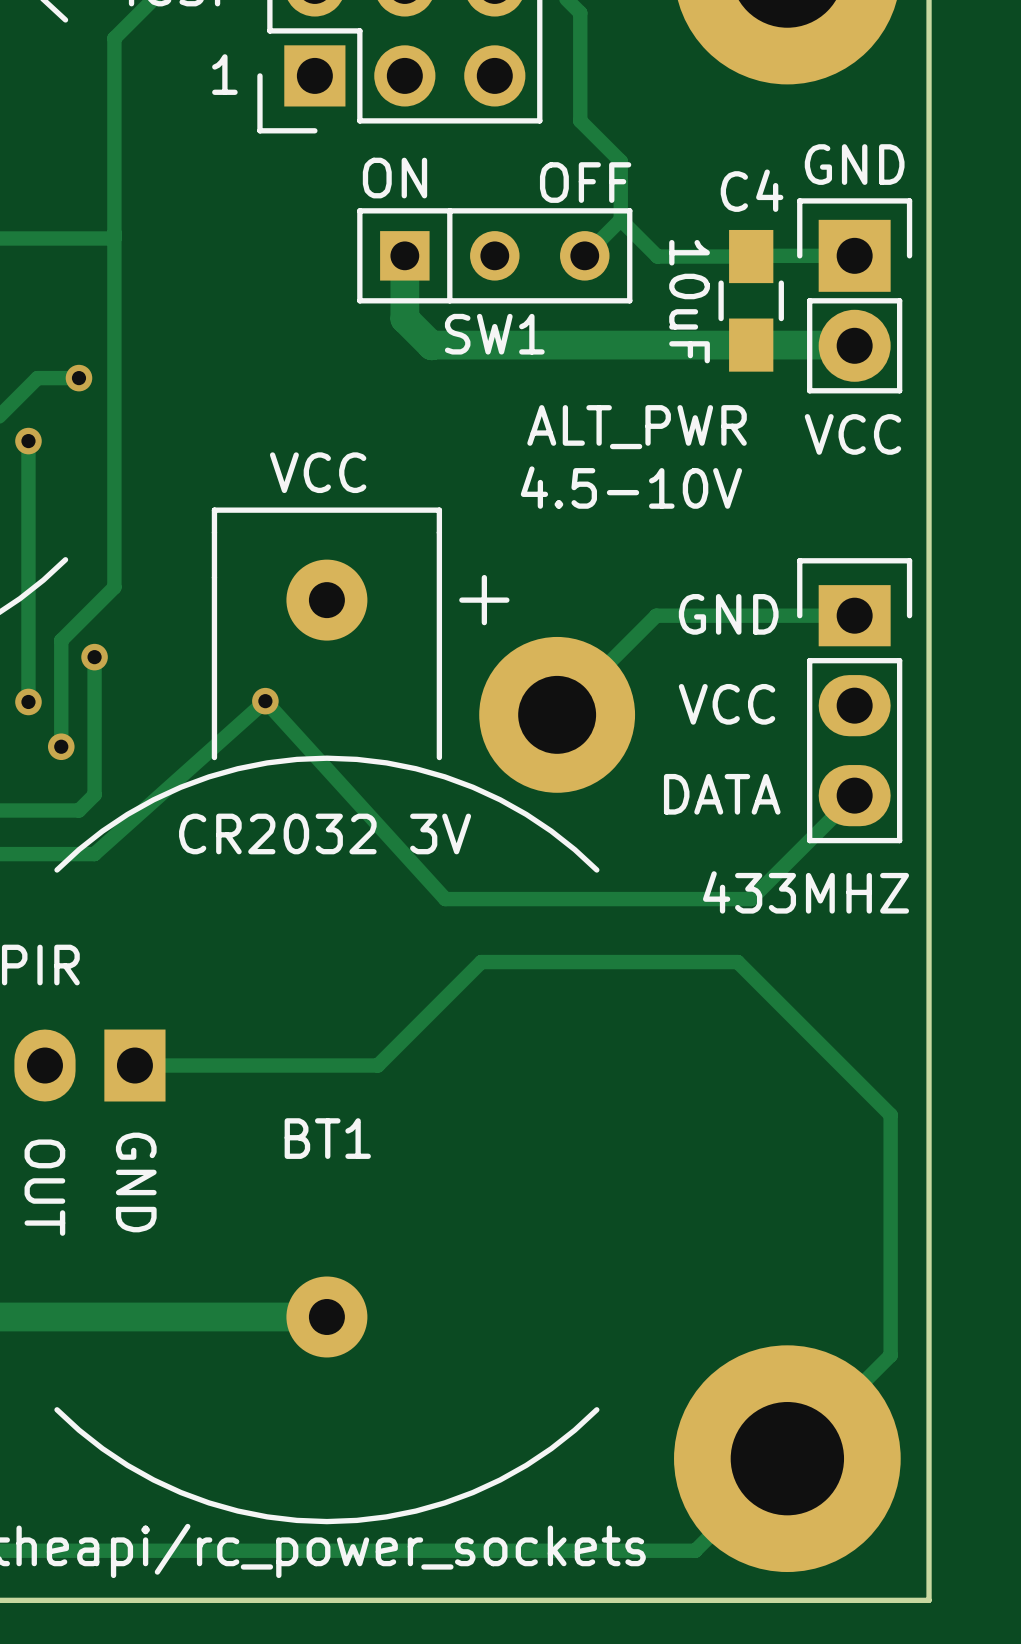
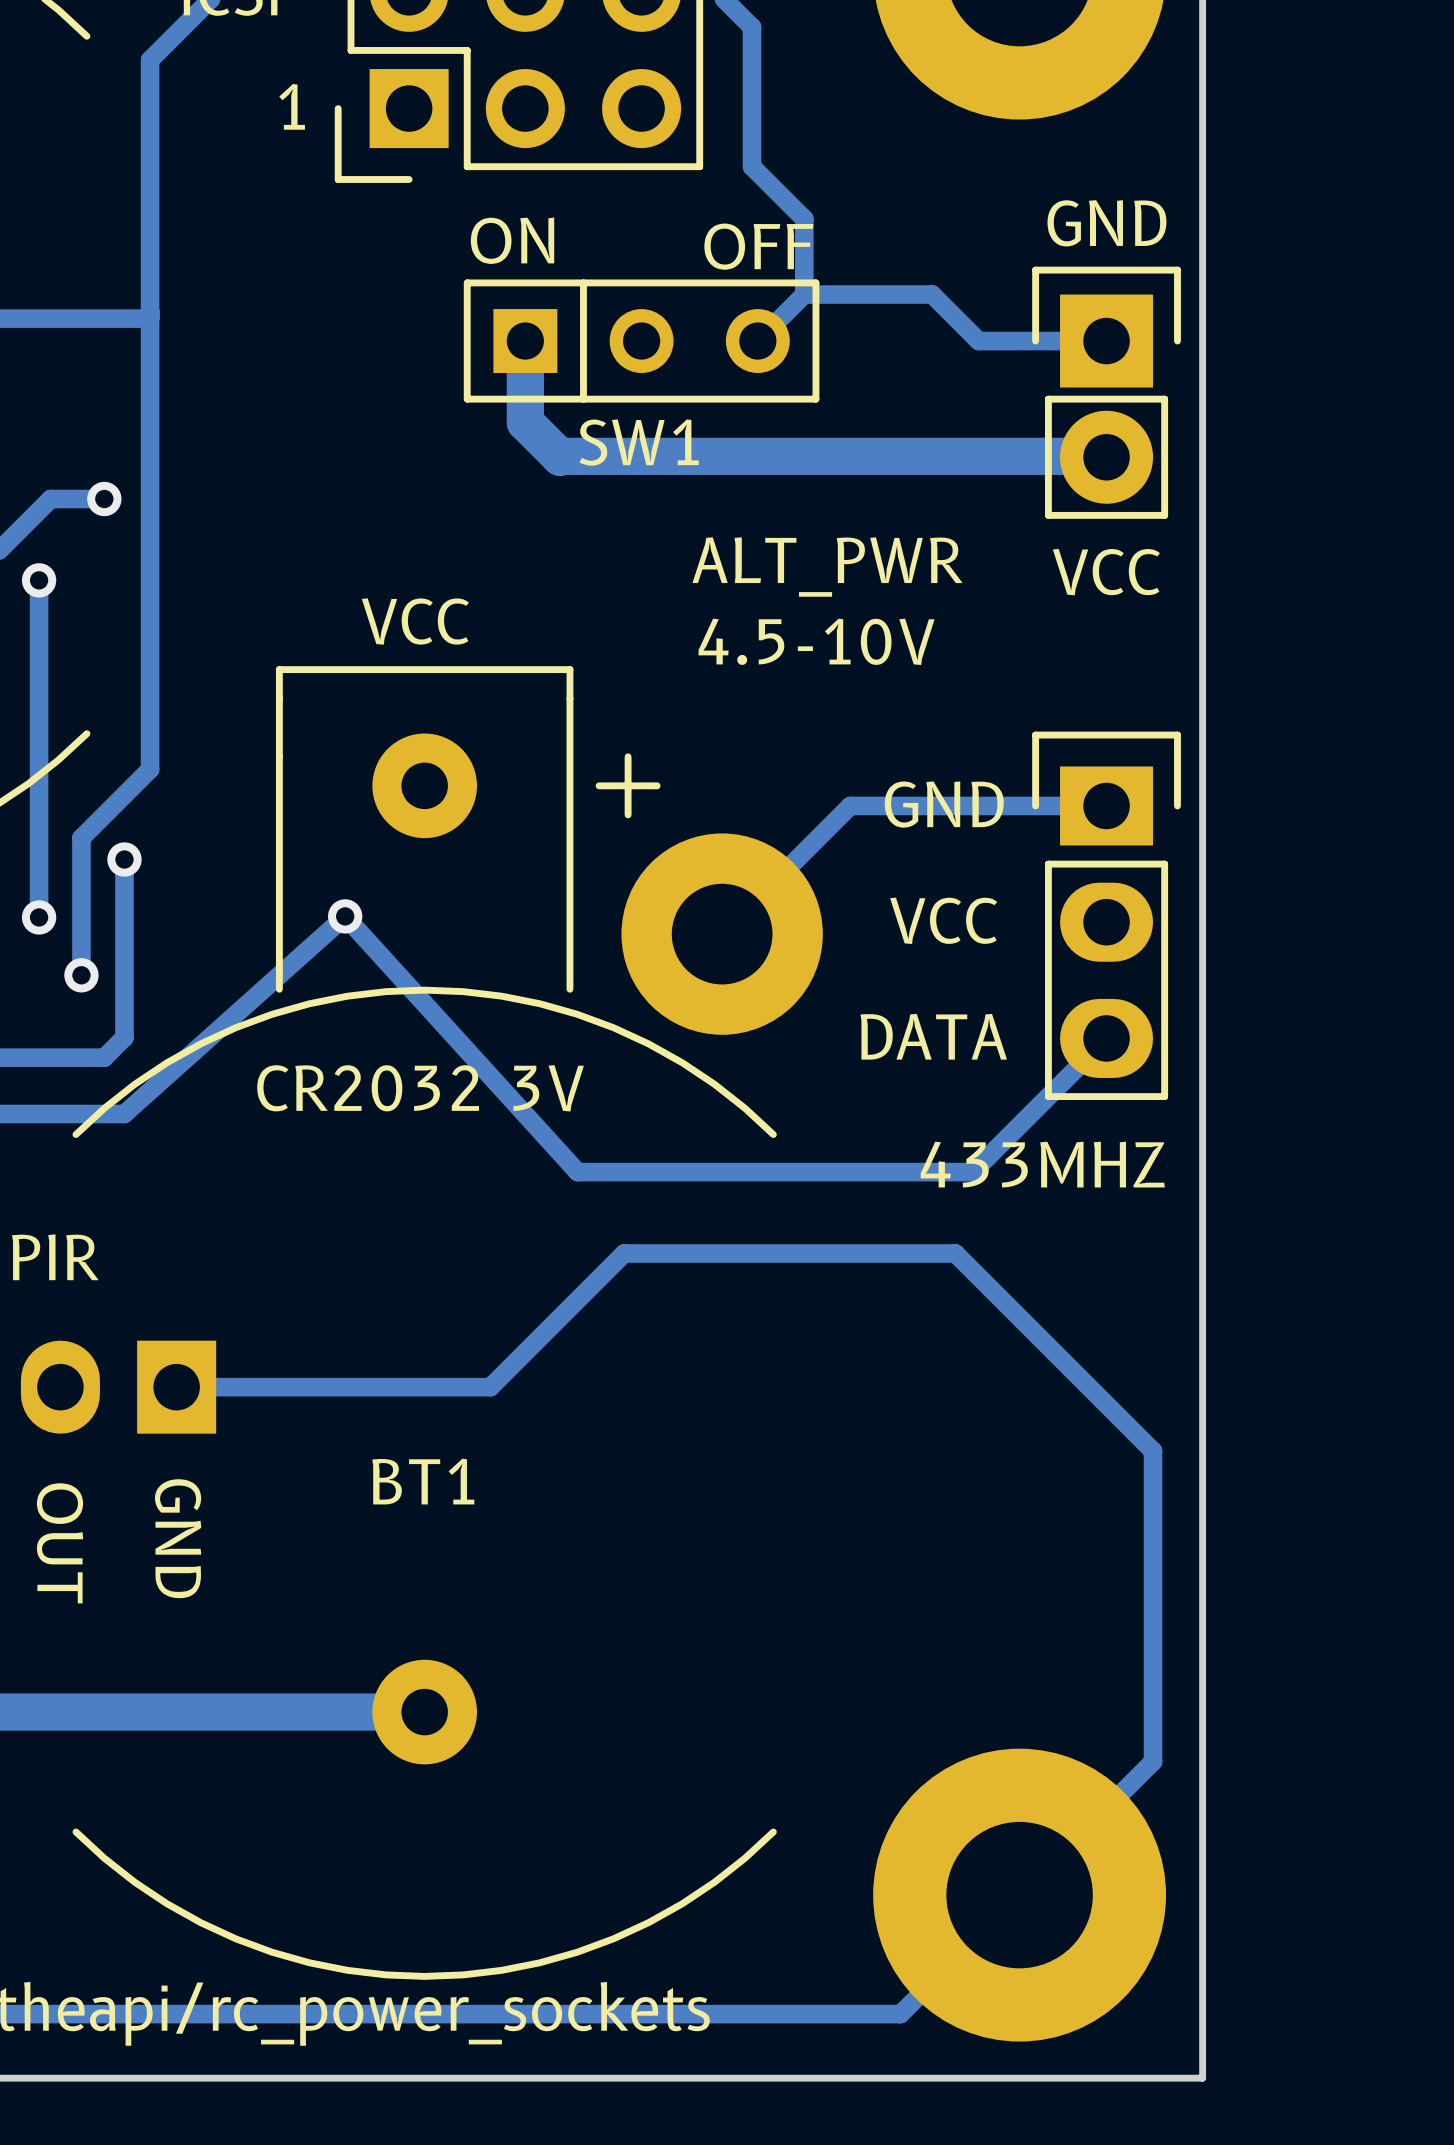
track: (620, 219) (657, 256) (754, 256) -> (804, 294) (932, 294) (978, 341)
C4: 10uF (751, 300) -> none

